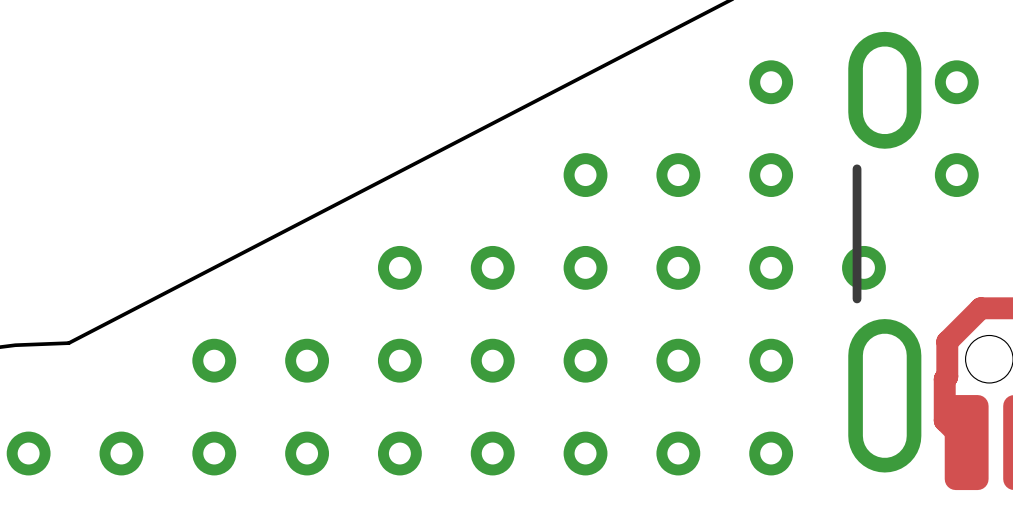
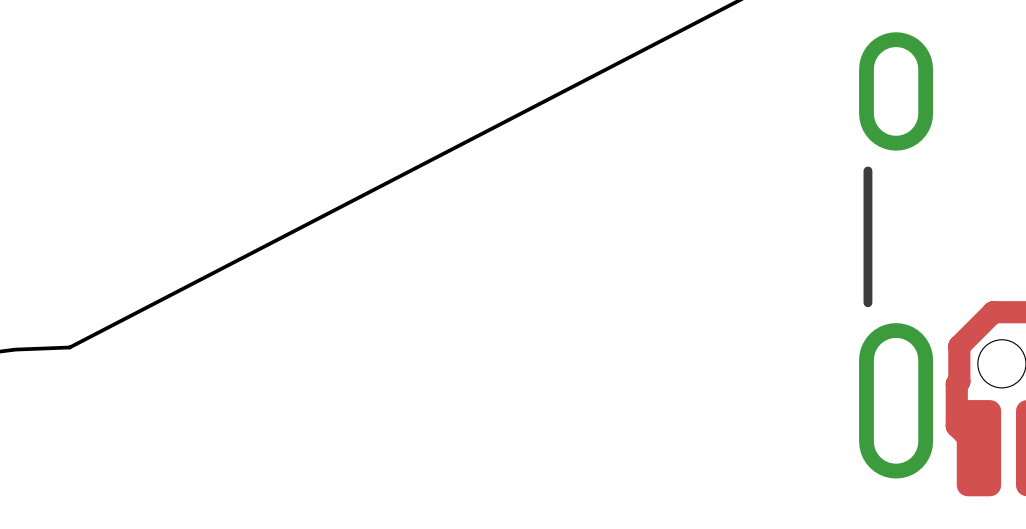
via: (771, 82) -> none
via: (956, 82) -> none
via: (585, 175) -> none
via: (678, 175) -> none
via: (771, 175) -> none
via: (956, 175) -> none
via: (399, 267) -> none
via: (492, 267) -> none
via: (585, 267) -> none
via: (678, 267) -> none
via: (771, 267) -> none
via: (863, 267) -> none
via: (214, 360) -> none
via: (307, 360) -> none
via: (399, 360) -> none
via: (492, 360) -> none
via: (585, 360) -> none
via: (678, 360) -> none
via: (771, 360) -> none
via: (28, 453) -> none
via: (121, 453) -> none
via: (214, 453) -> none
via: (307, 453) -> none
via: (399, 453) -> none
via: (492, 453) -> none
via: (585, 453) -> none
via: (678, 453) -> none
via: (771, 453) -> none

